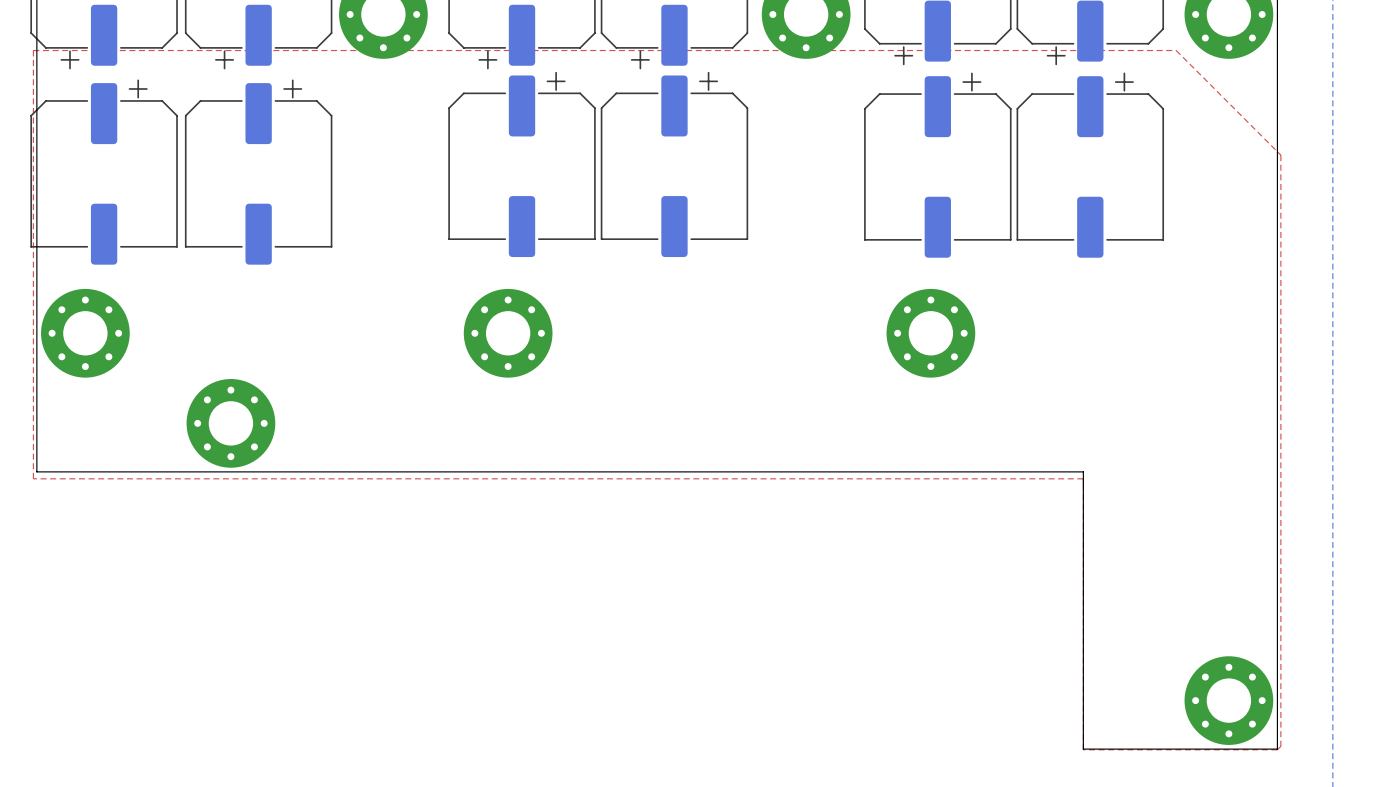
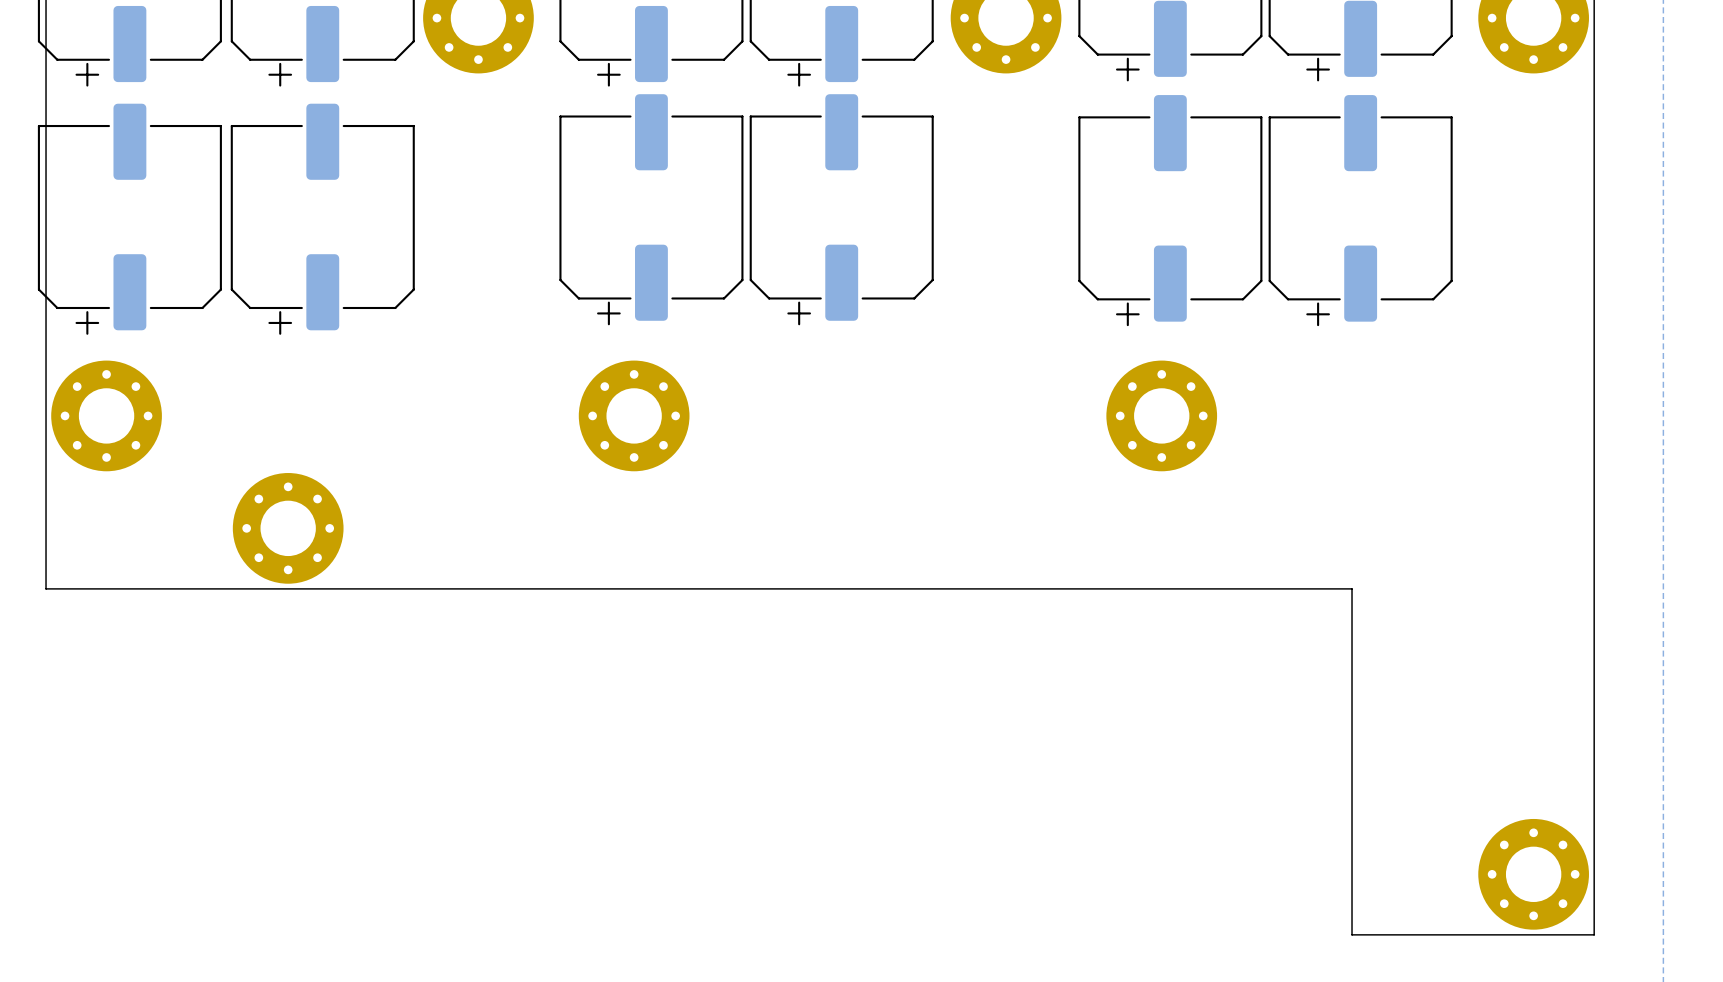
top zone outline: (1176, 50) (33, 50) (33, 478) (1083, 478) (1083, 749) (1277, 749) (1280, 746) (1280, 155) (1176, 50) -> none
part rotation: 0° (522, 164) -> 180° (651, 209)
part rotation: 0° (674, 164) -> 180° (841, 209)
part rotation: 0° (937, 165) -> 180° (1170, 210)
part rotation: 0° (1090, 165) -> 180° (1360, 210)
part rotation: 0° (104, 172) -> 180° (129, 219)
part rotation: 0° (258, 172) -> 180° (322, 219)

